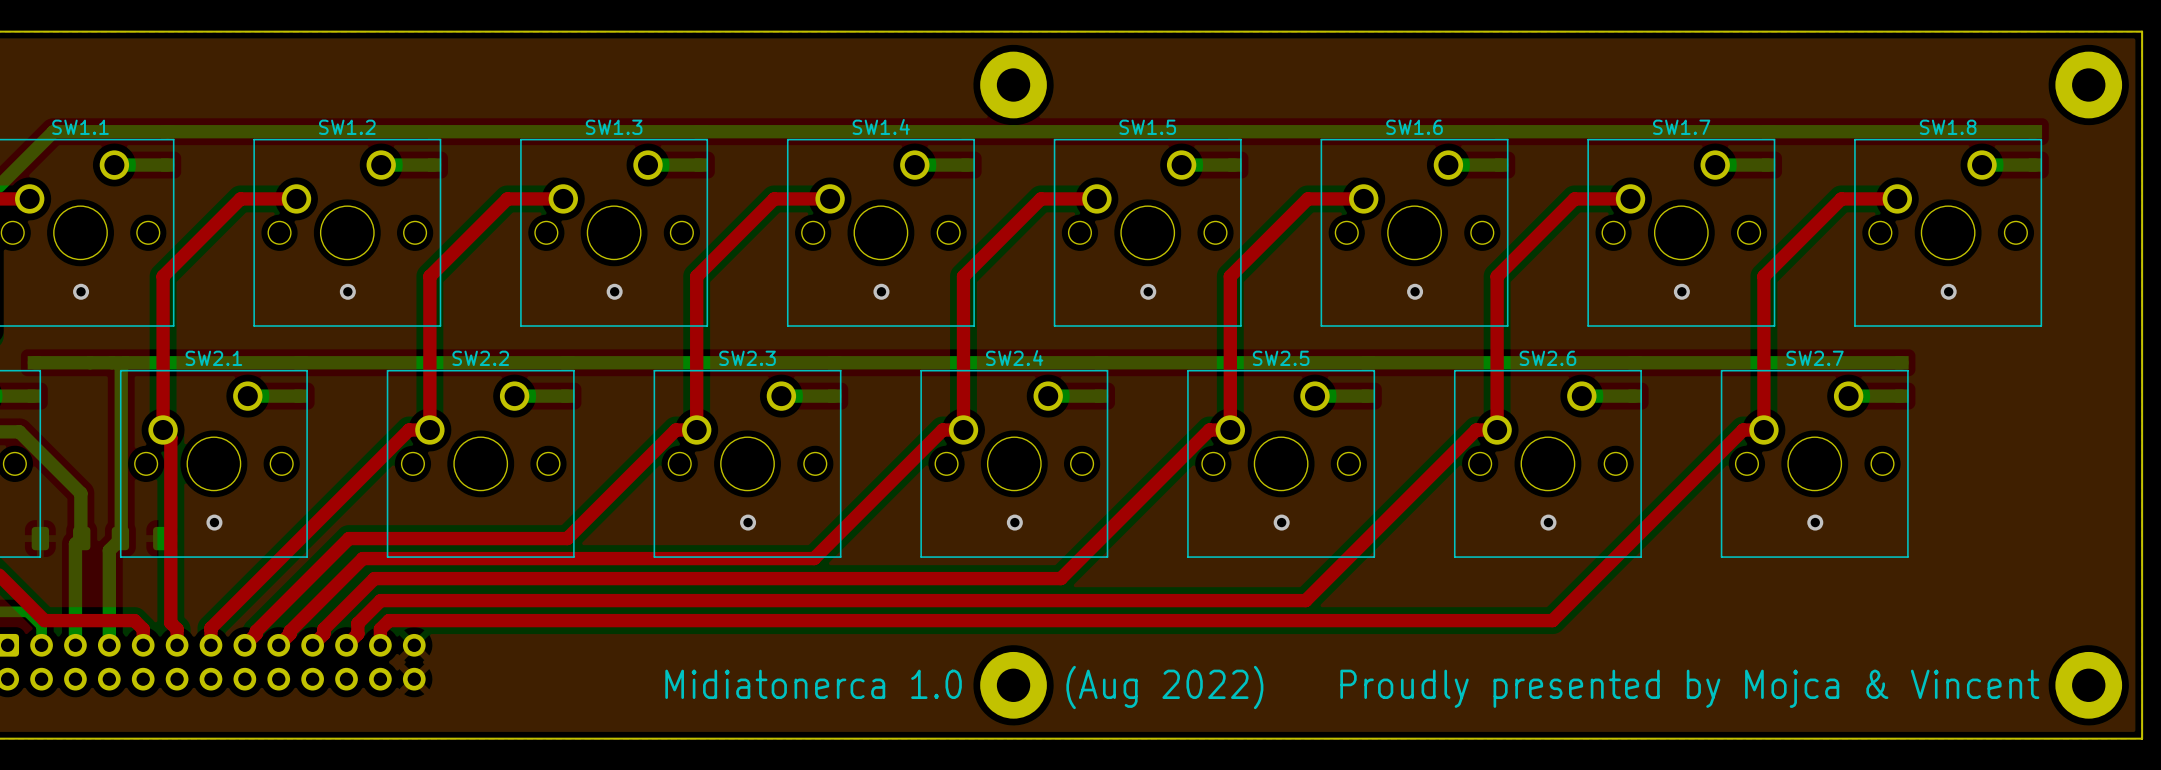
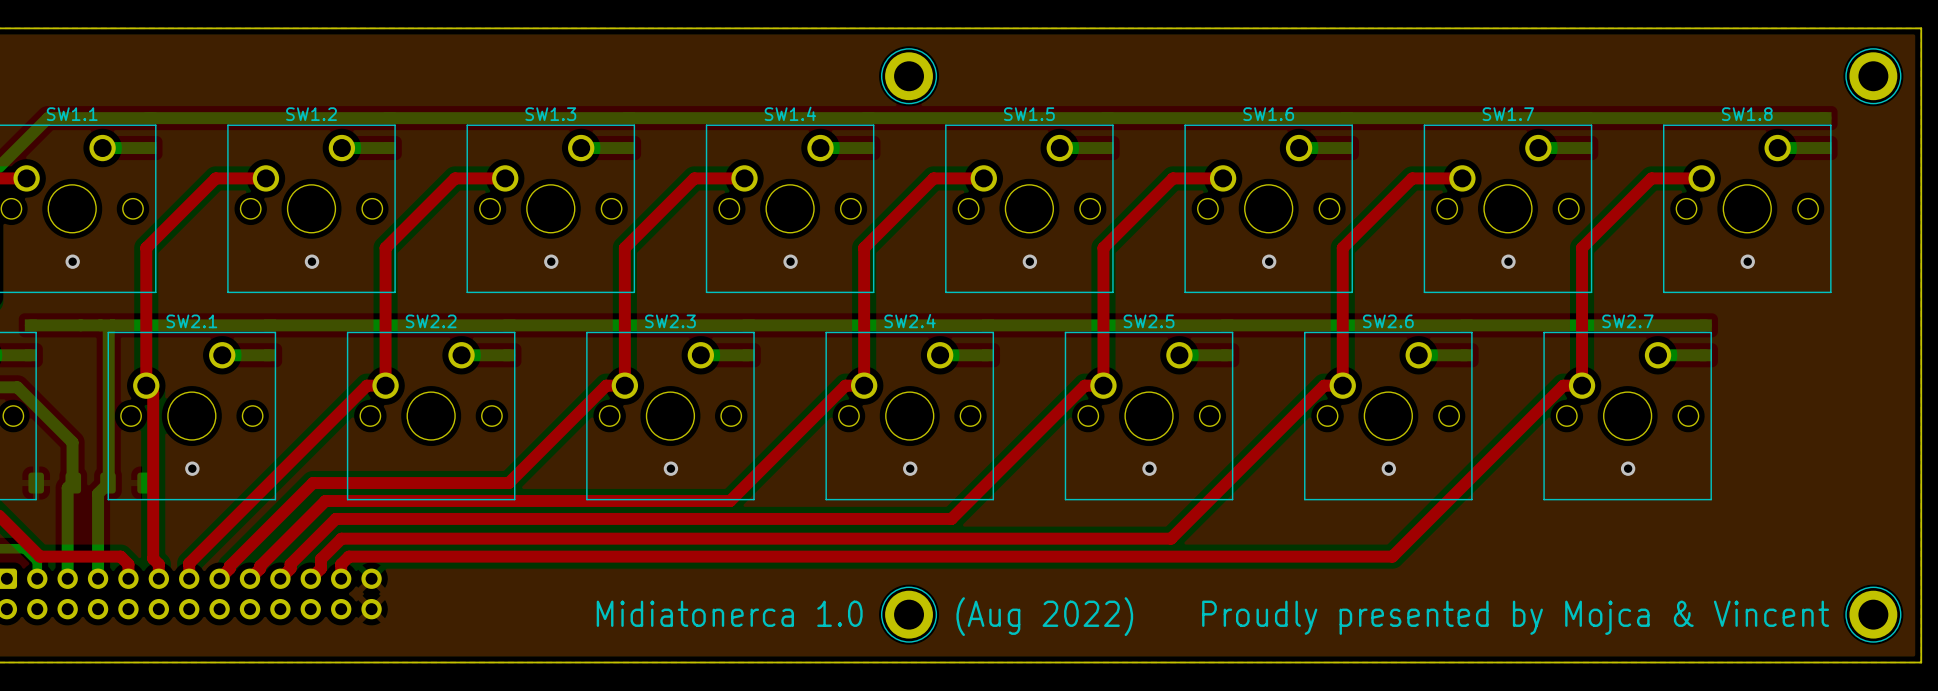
part footprint: [980, 51, 1047, 119] -> [880, 48, 938, 105]
part footprint: [2055, 51, 2123, 119] -> [1845, 48, 1902, 105]
part footprint: [980, 651, 1047, 719] -> [880, 586, 938, 643]
part footprint: [2055, 651, 2123, 719] -> [1845, 586, 1902, 643]

